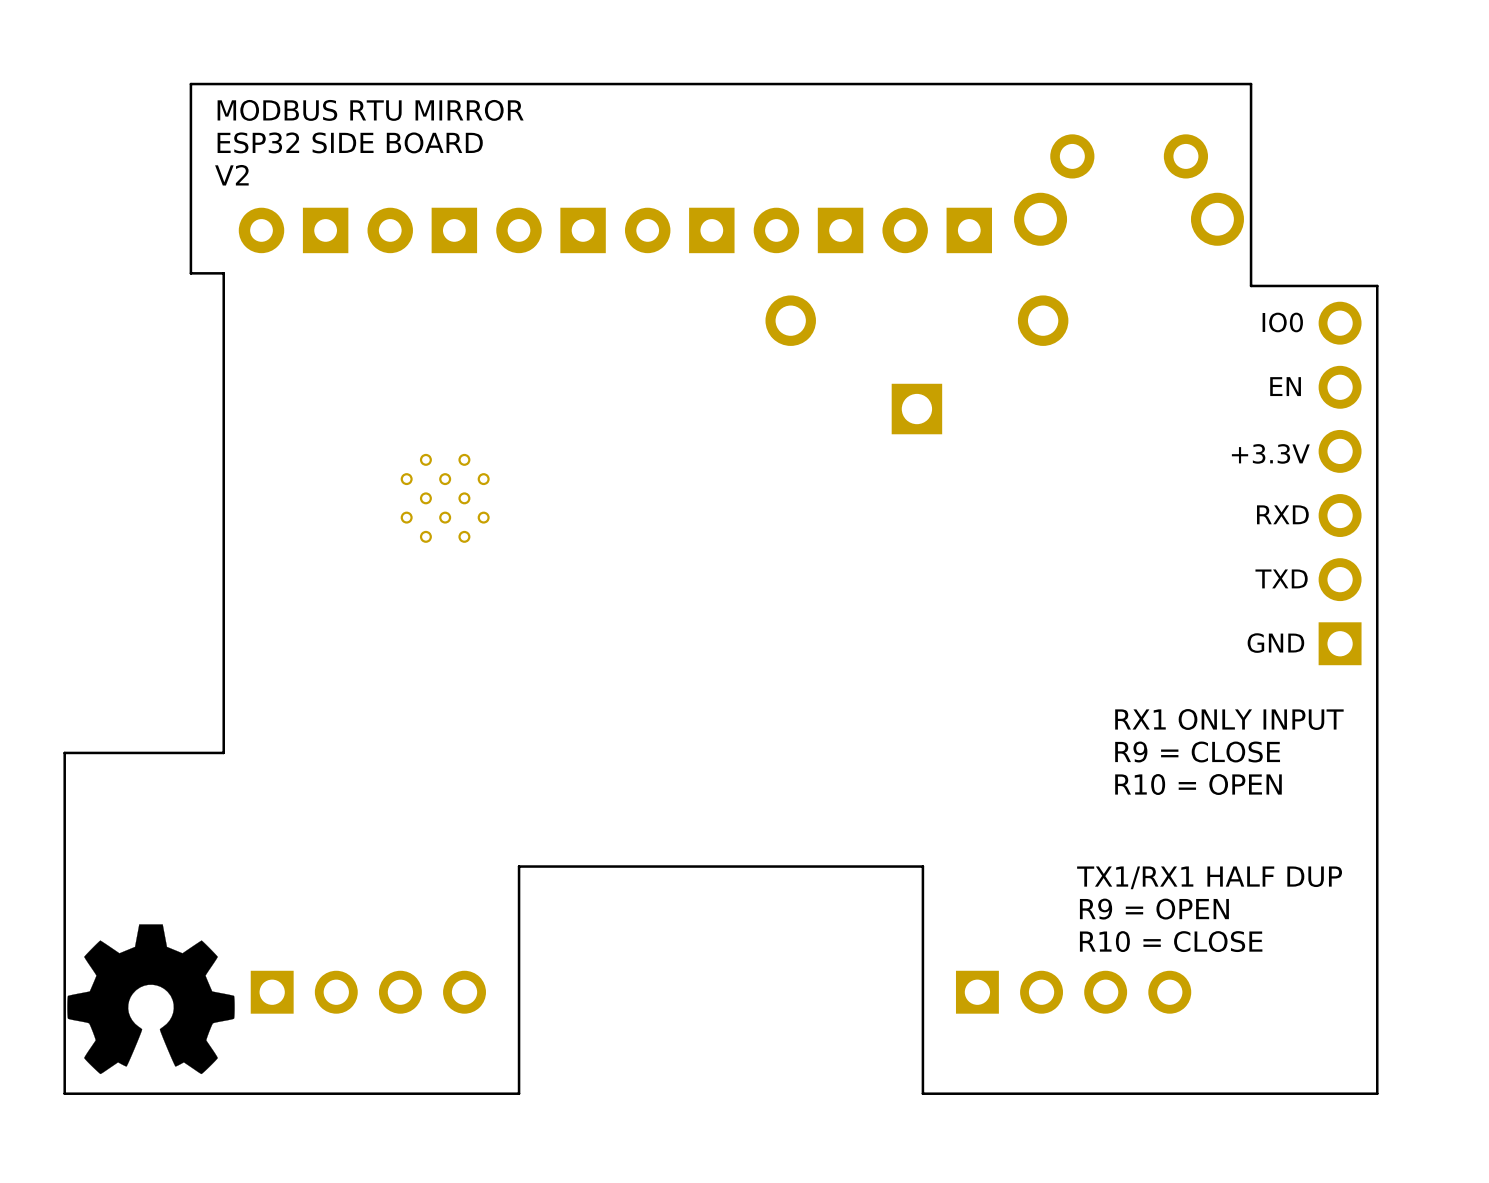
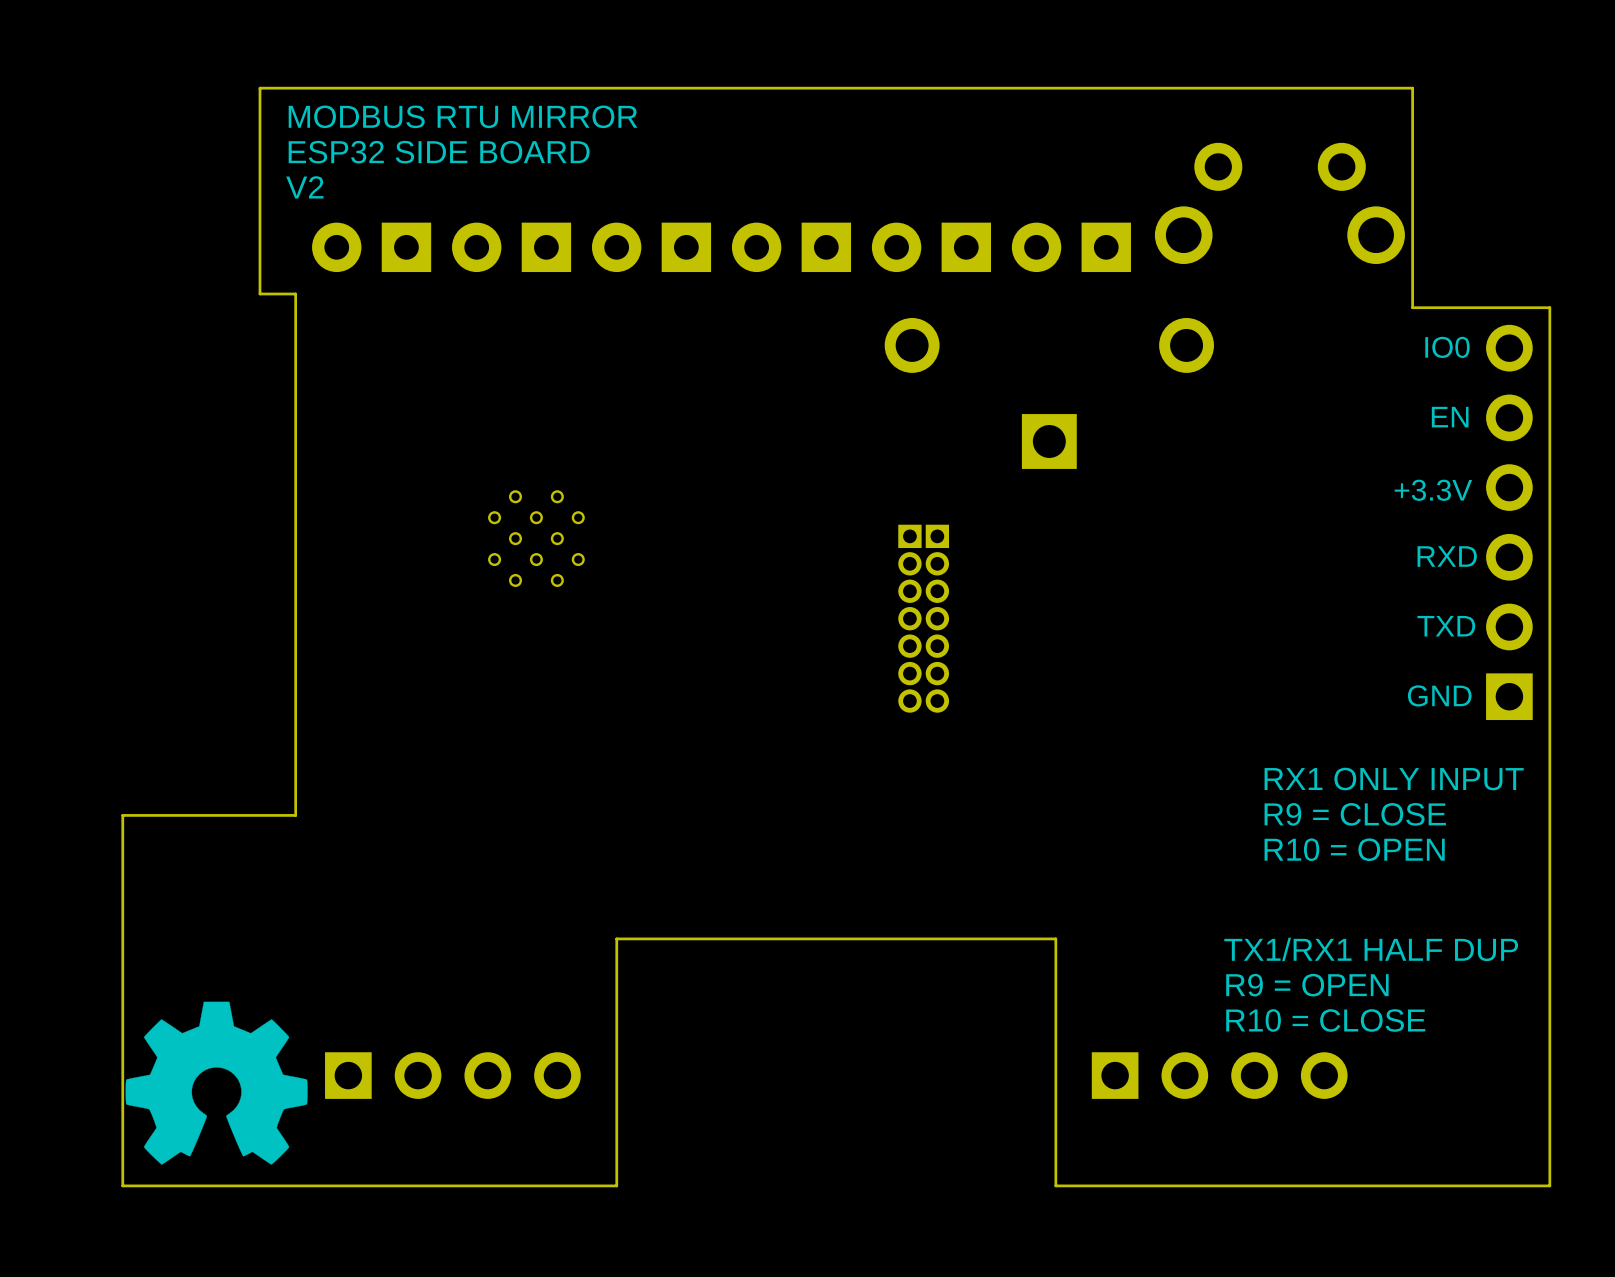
part: none -> (909, 618)
part: none -> (937, 618)

